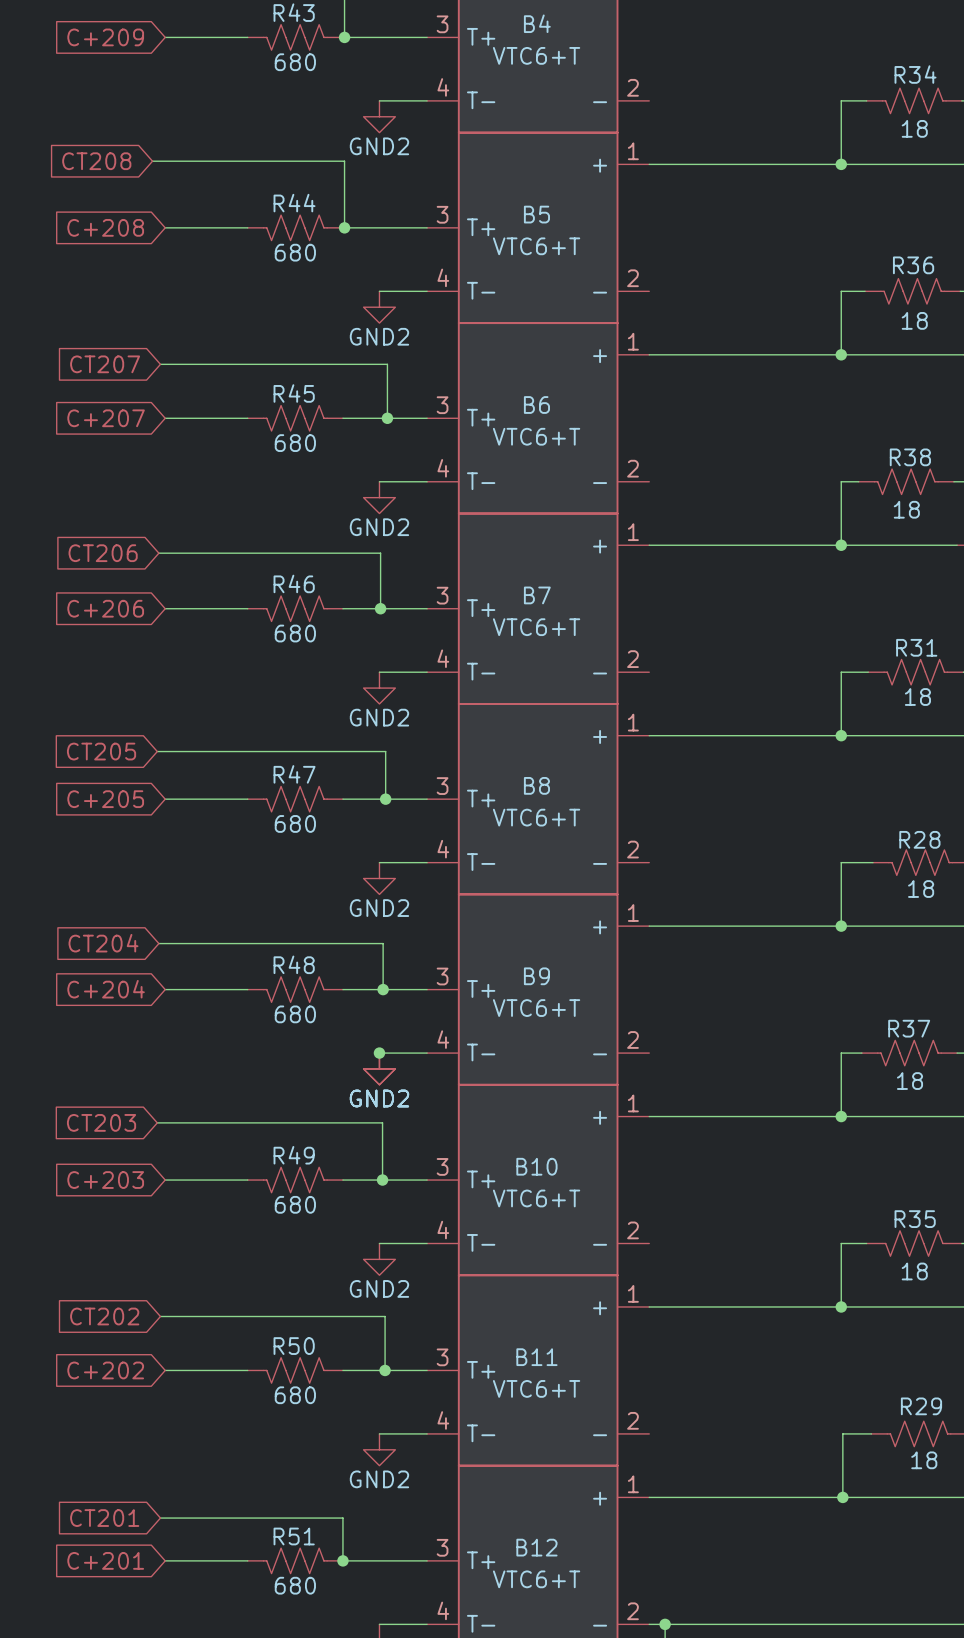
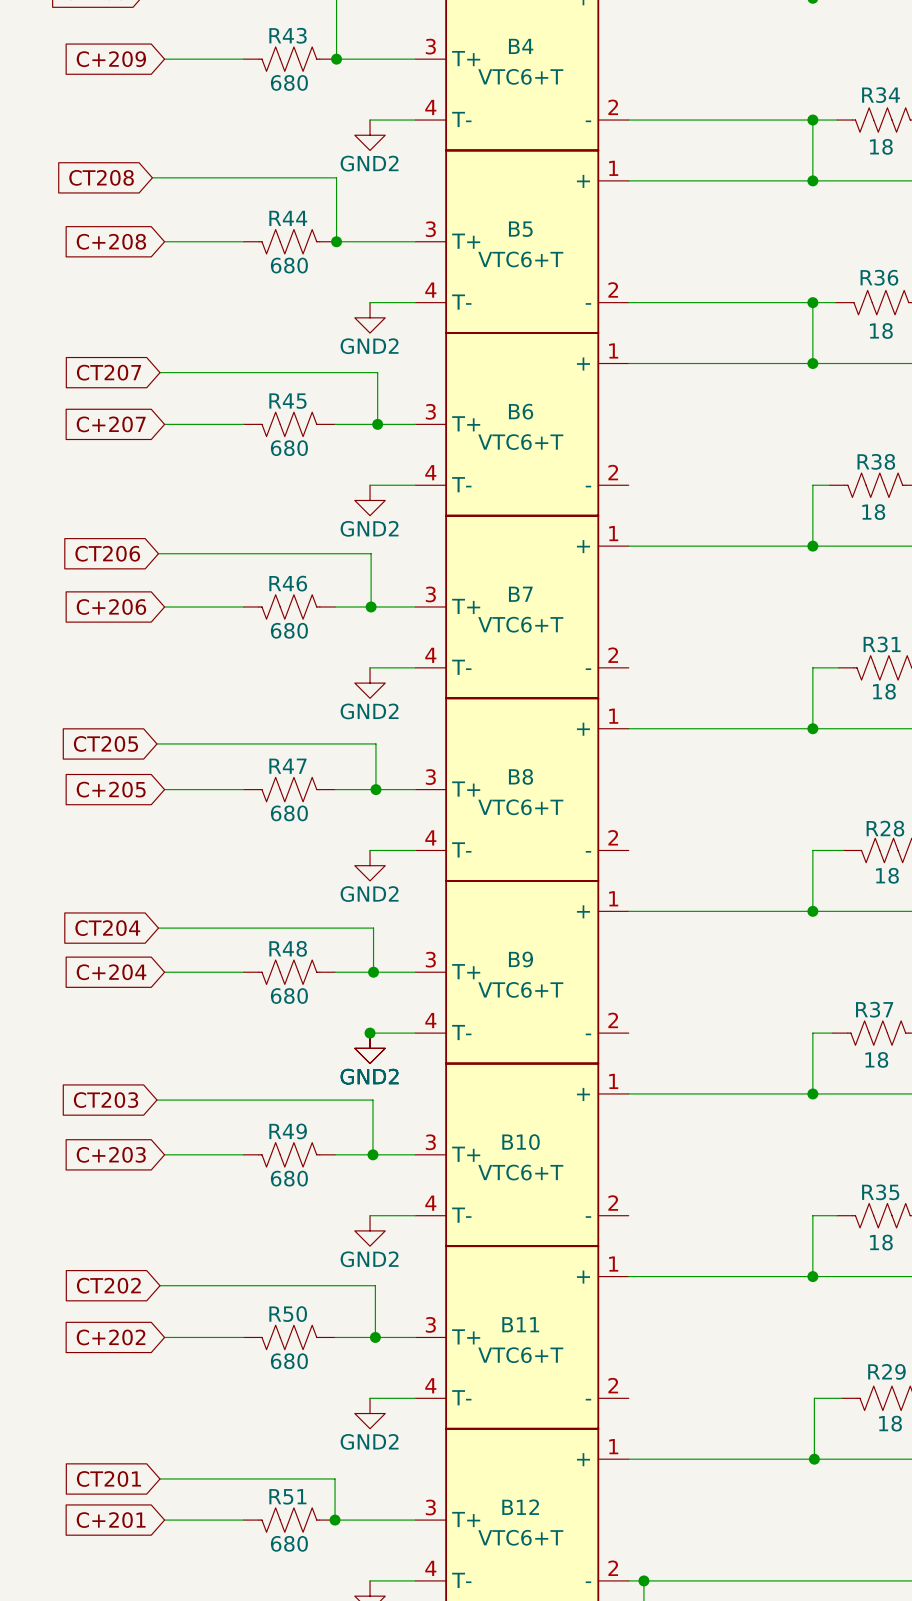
wire: none -> (628, 120) (812, 120)
junction: none -> (812, 120)
wire: none -> (628, 302) (812, 302)
junction: none -> (812, 302)

